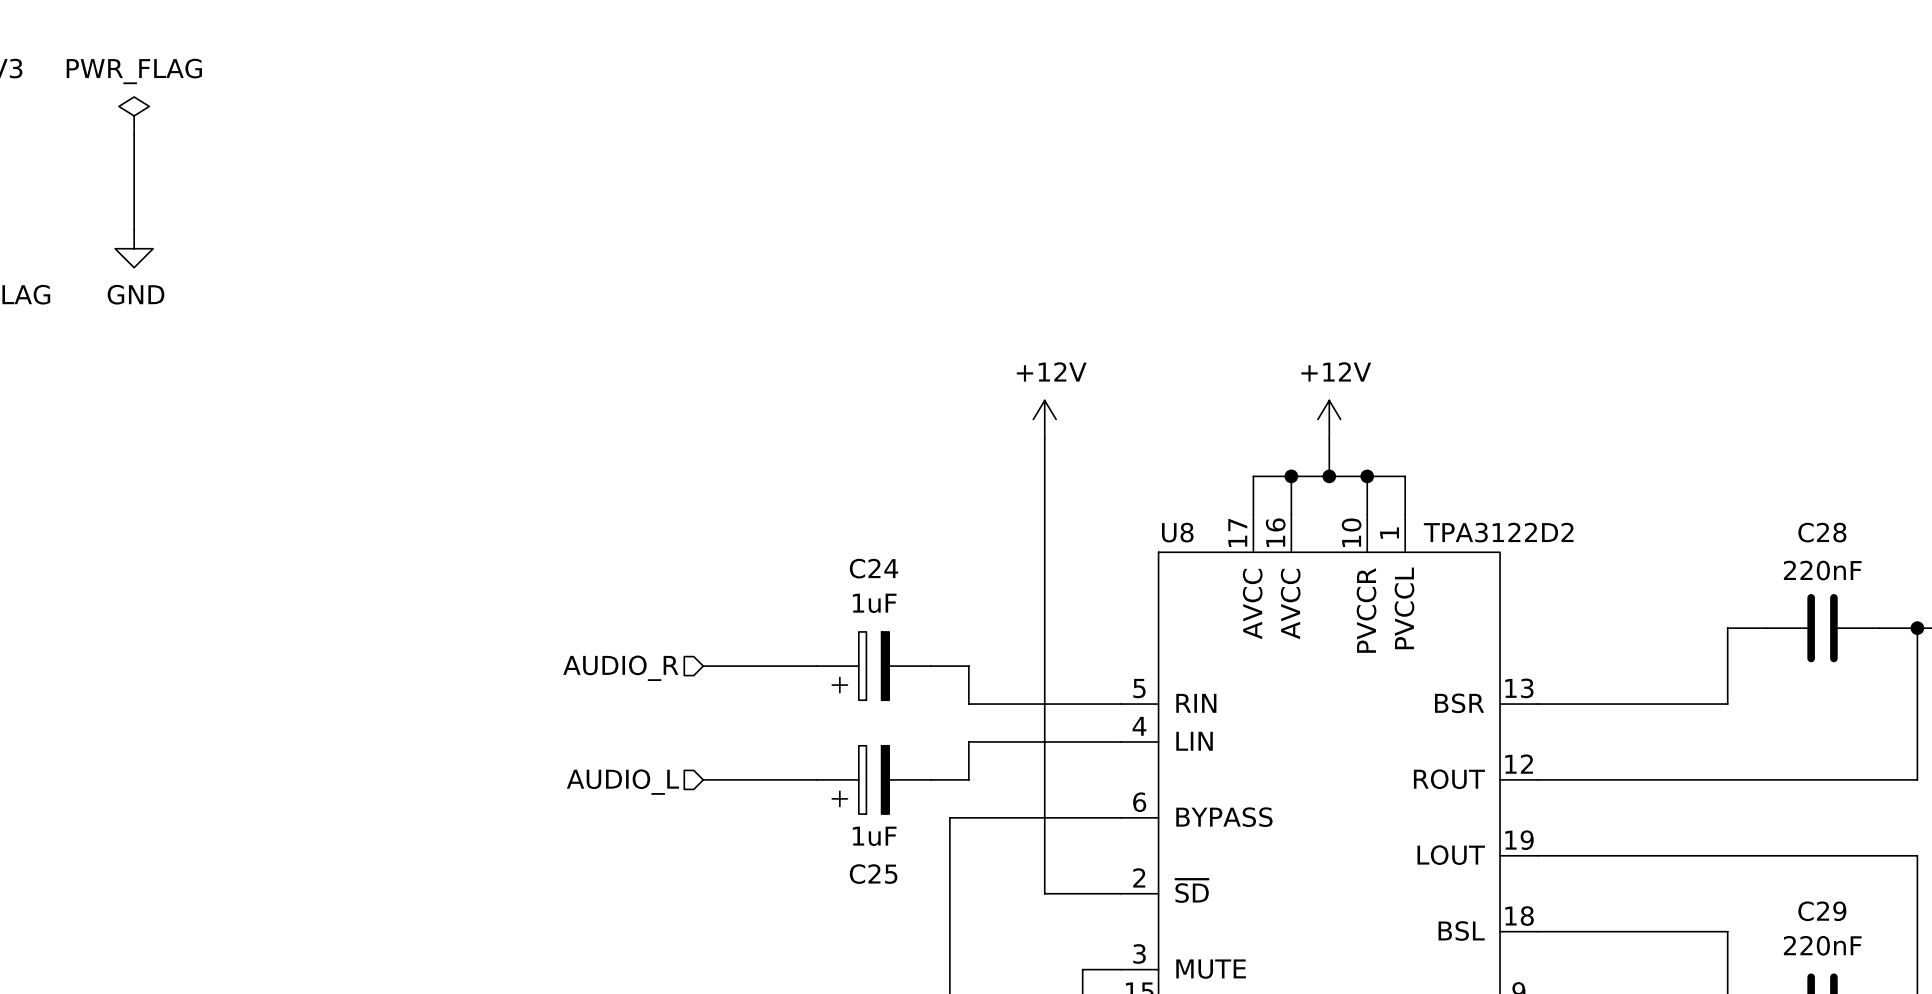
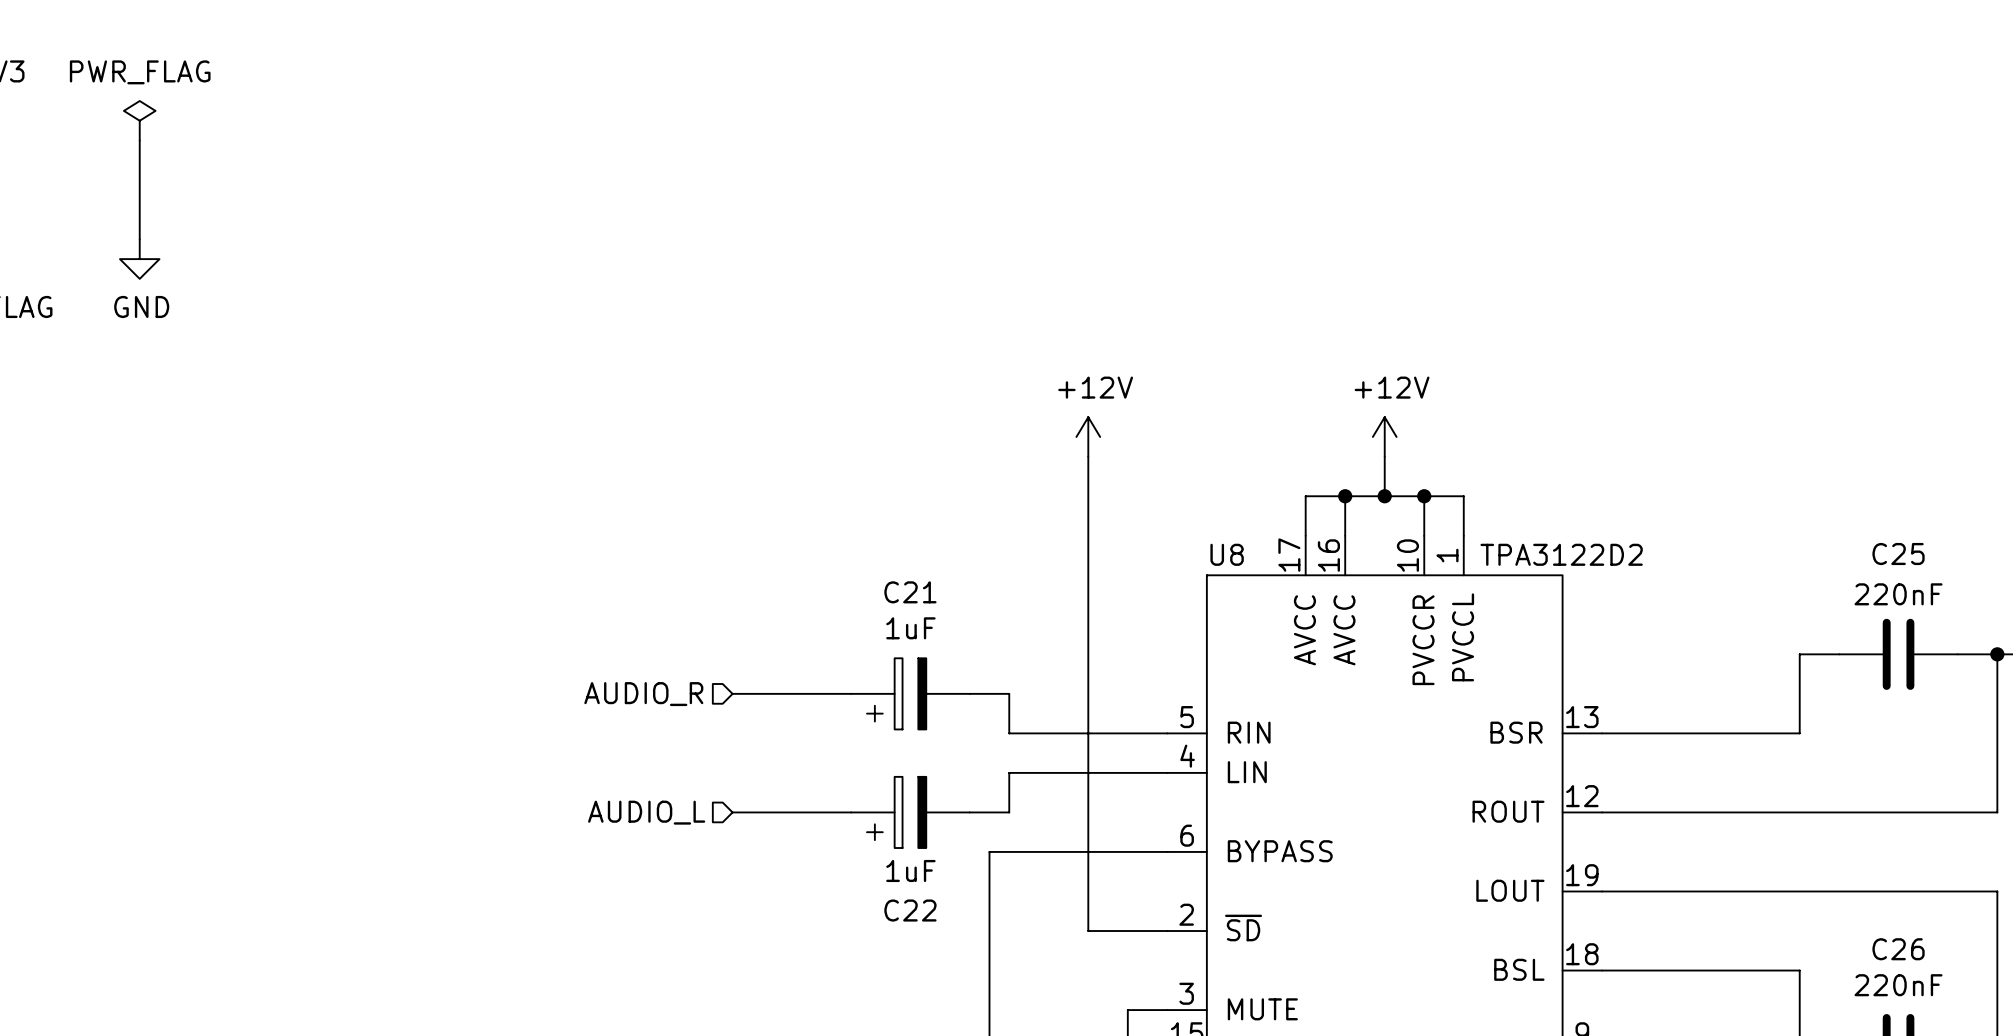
C28 name: C28 (1822, 532) -> C25 (1898, 554)
C24 name: C24 (874, 568) -> C21 (910, 592)
C25 name: C25 (873, 874) -> C22 (910, 910)
C29 name: C29 (1822, 911) -> C26 (1898, 949)

